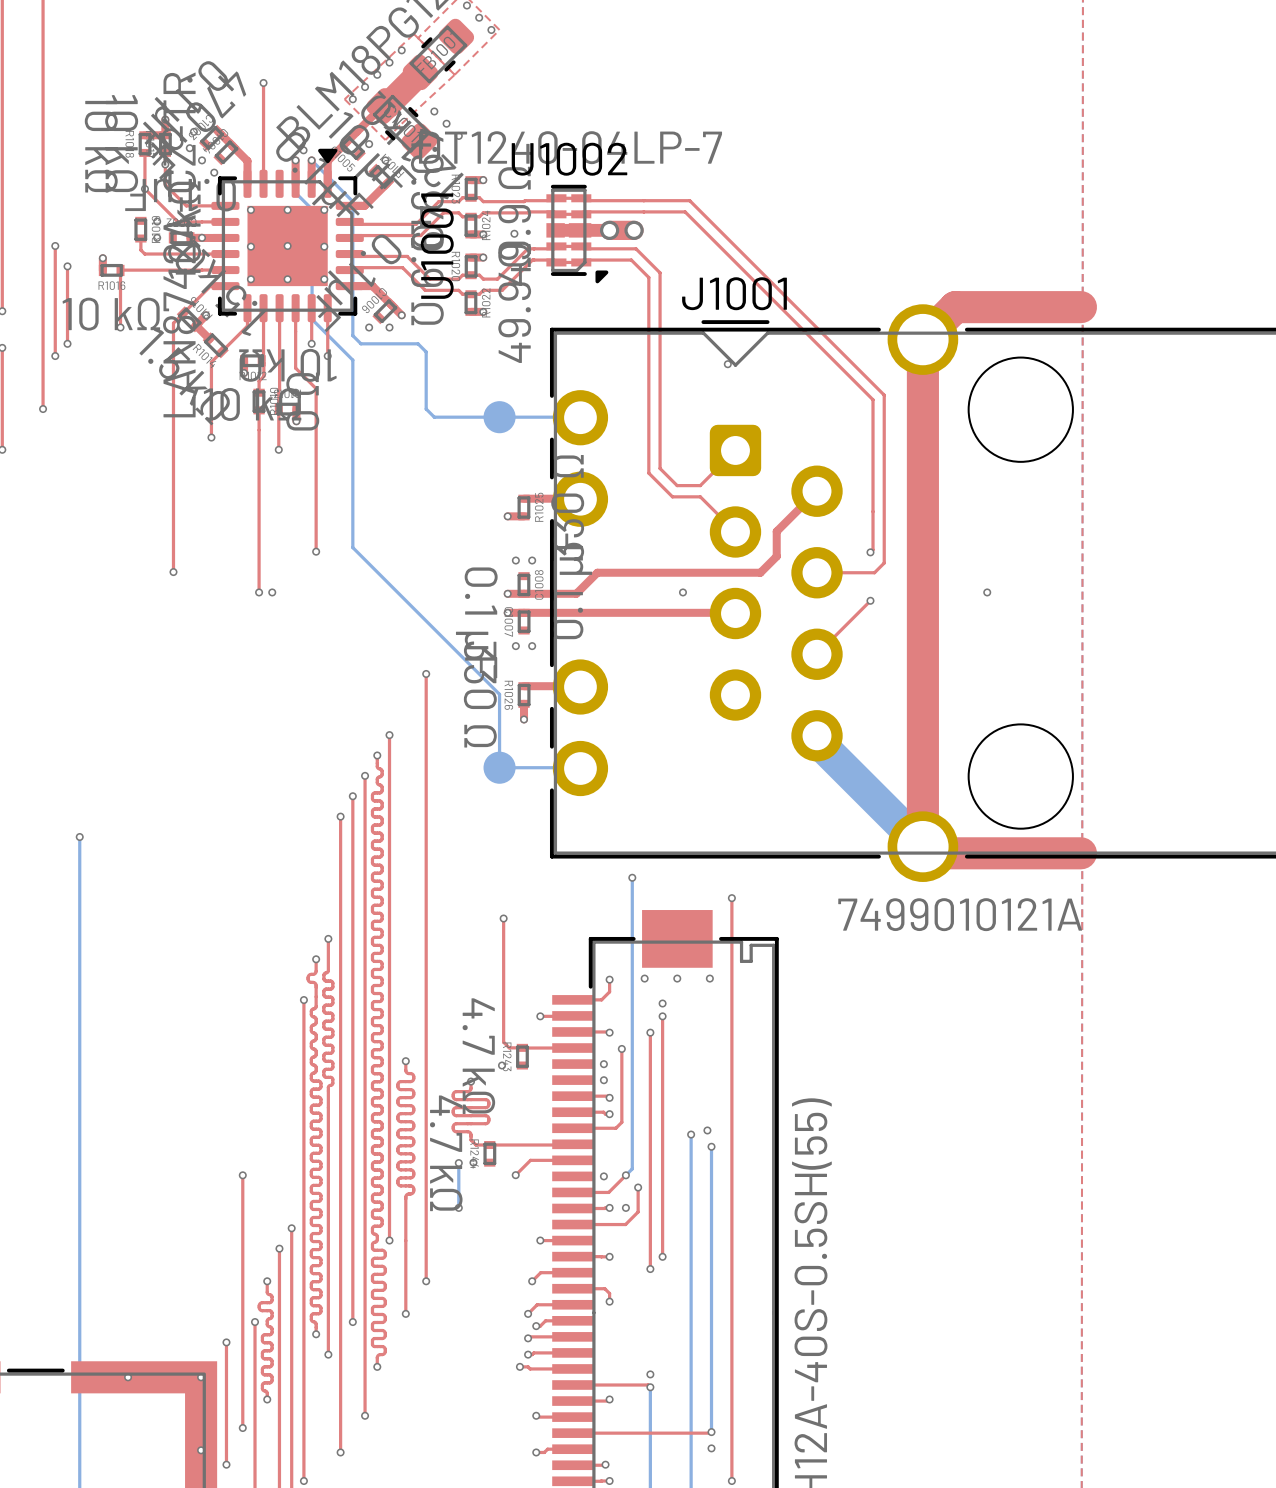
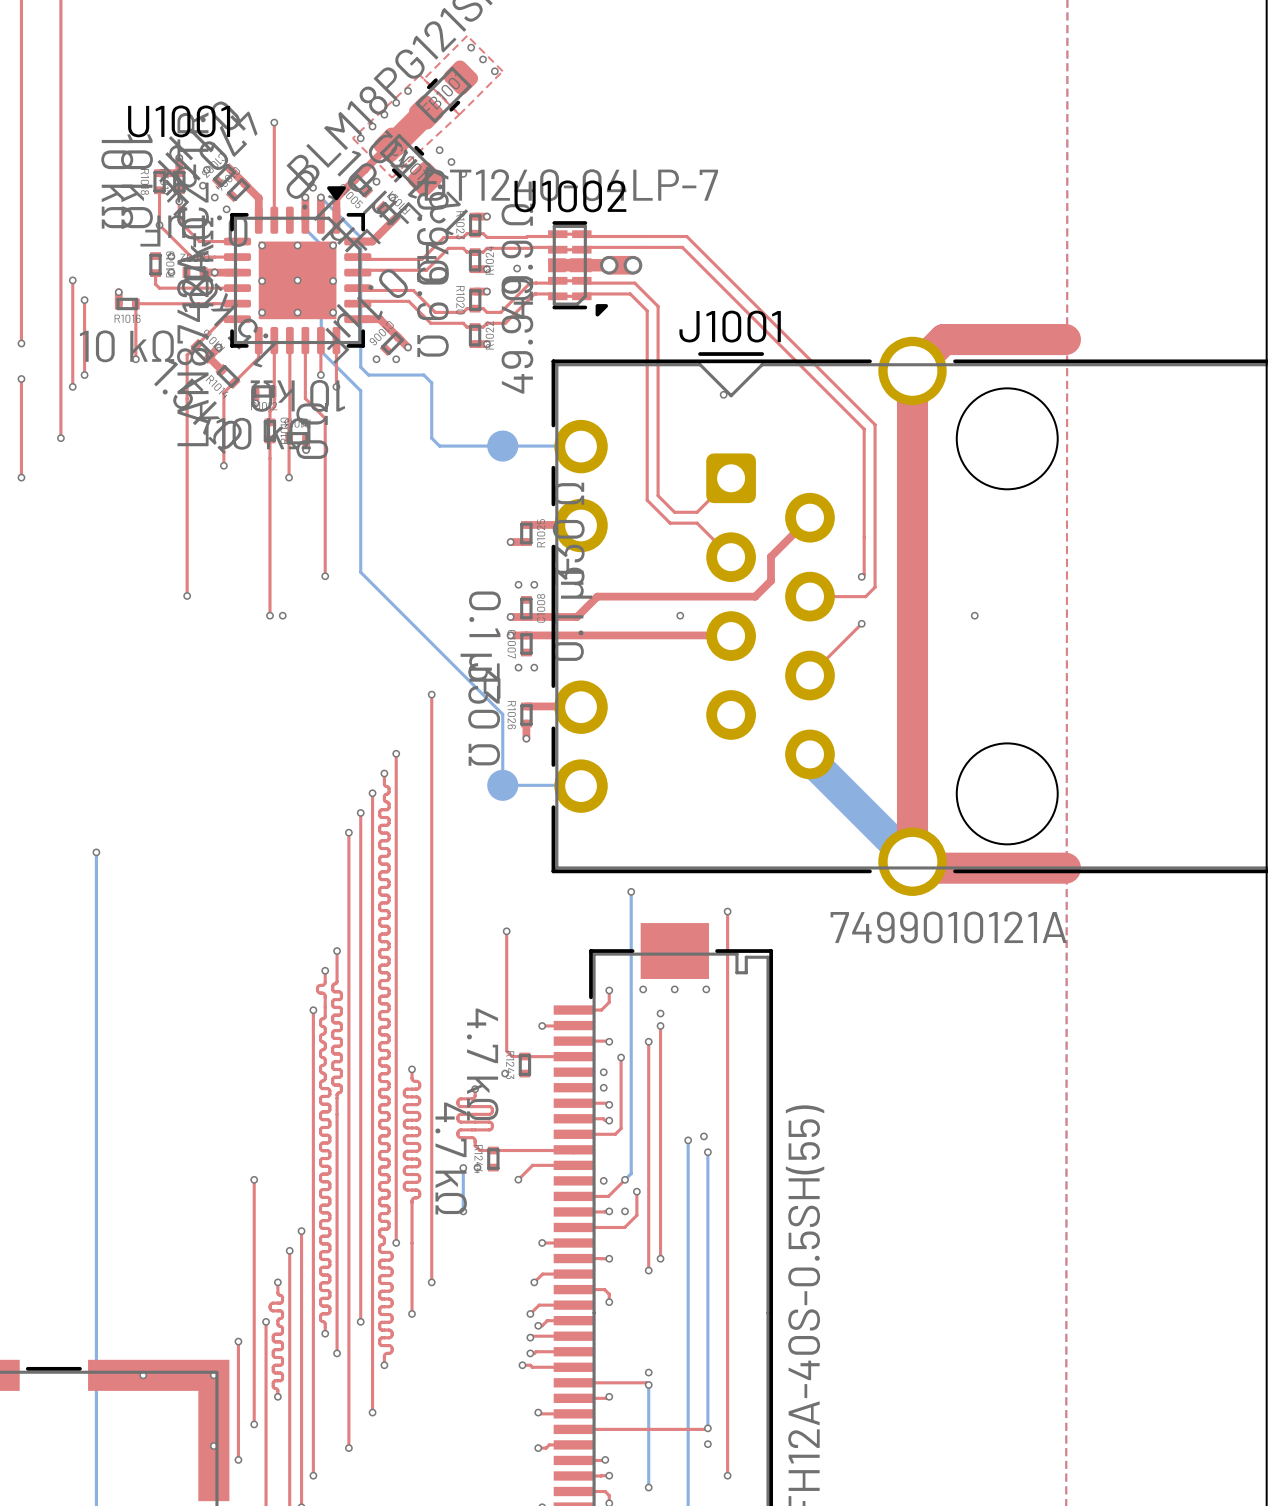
U1001 name rotation: 0° (437, 246) -> 90° clockwise (179, 121)
U1001 name position: U1001 (437, 246) -> U1001 (179, 121)

